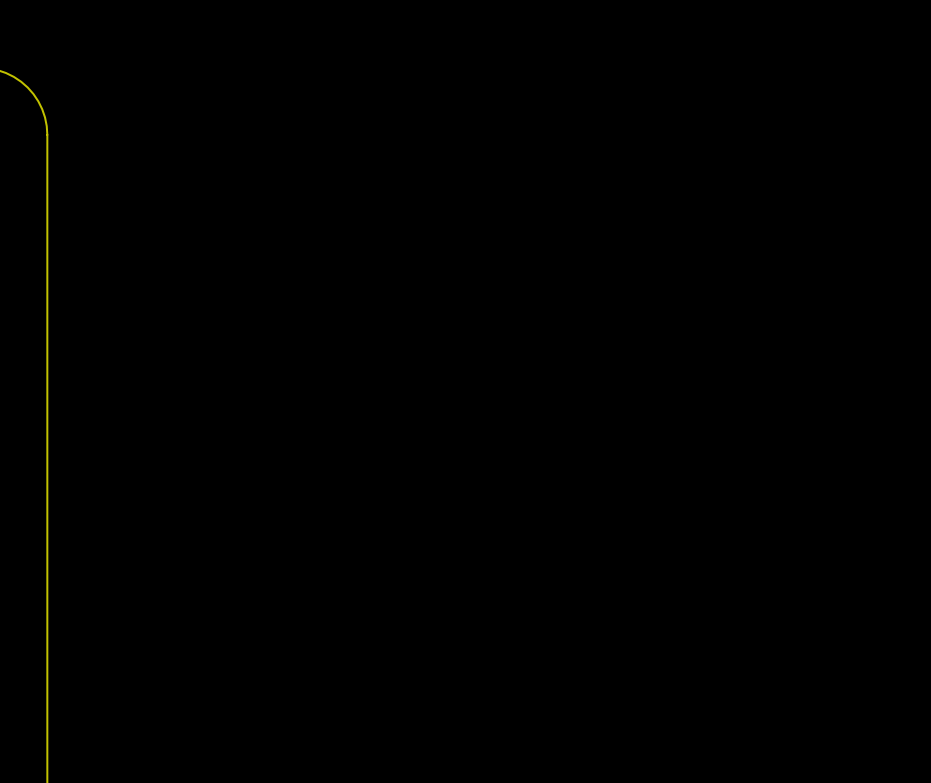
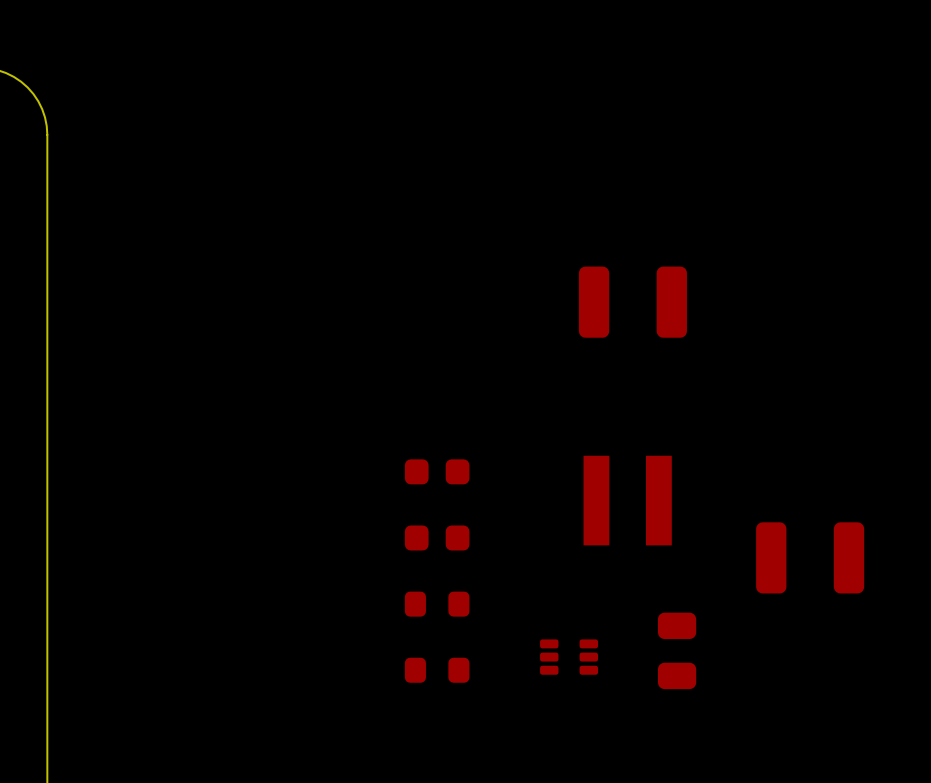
part: none -> (632, 302)
part: none -> (437, 471)
part: none -> (627, 500)
part: none -> (437, 537)
part: none -> (810, 557)
part: none -> (437, 604)
part: none -> (677, 650)
part: none -> (569, 657)
part: none -> (437, 670)

